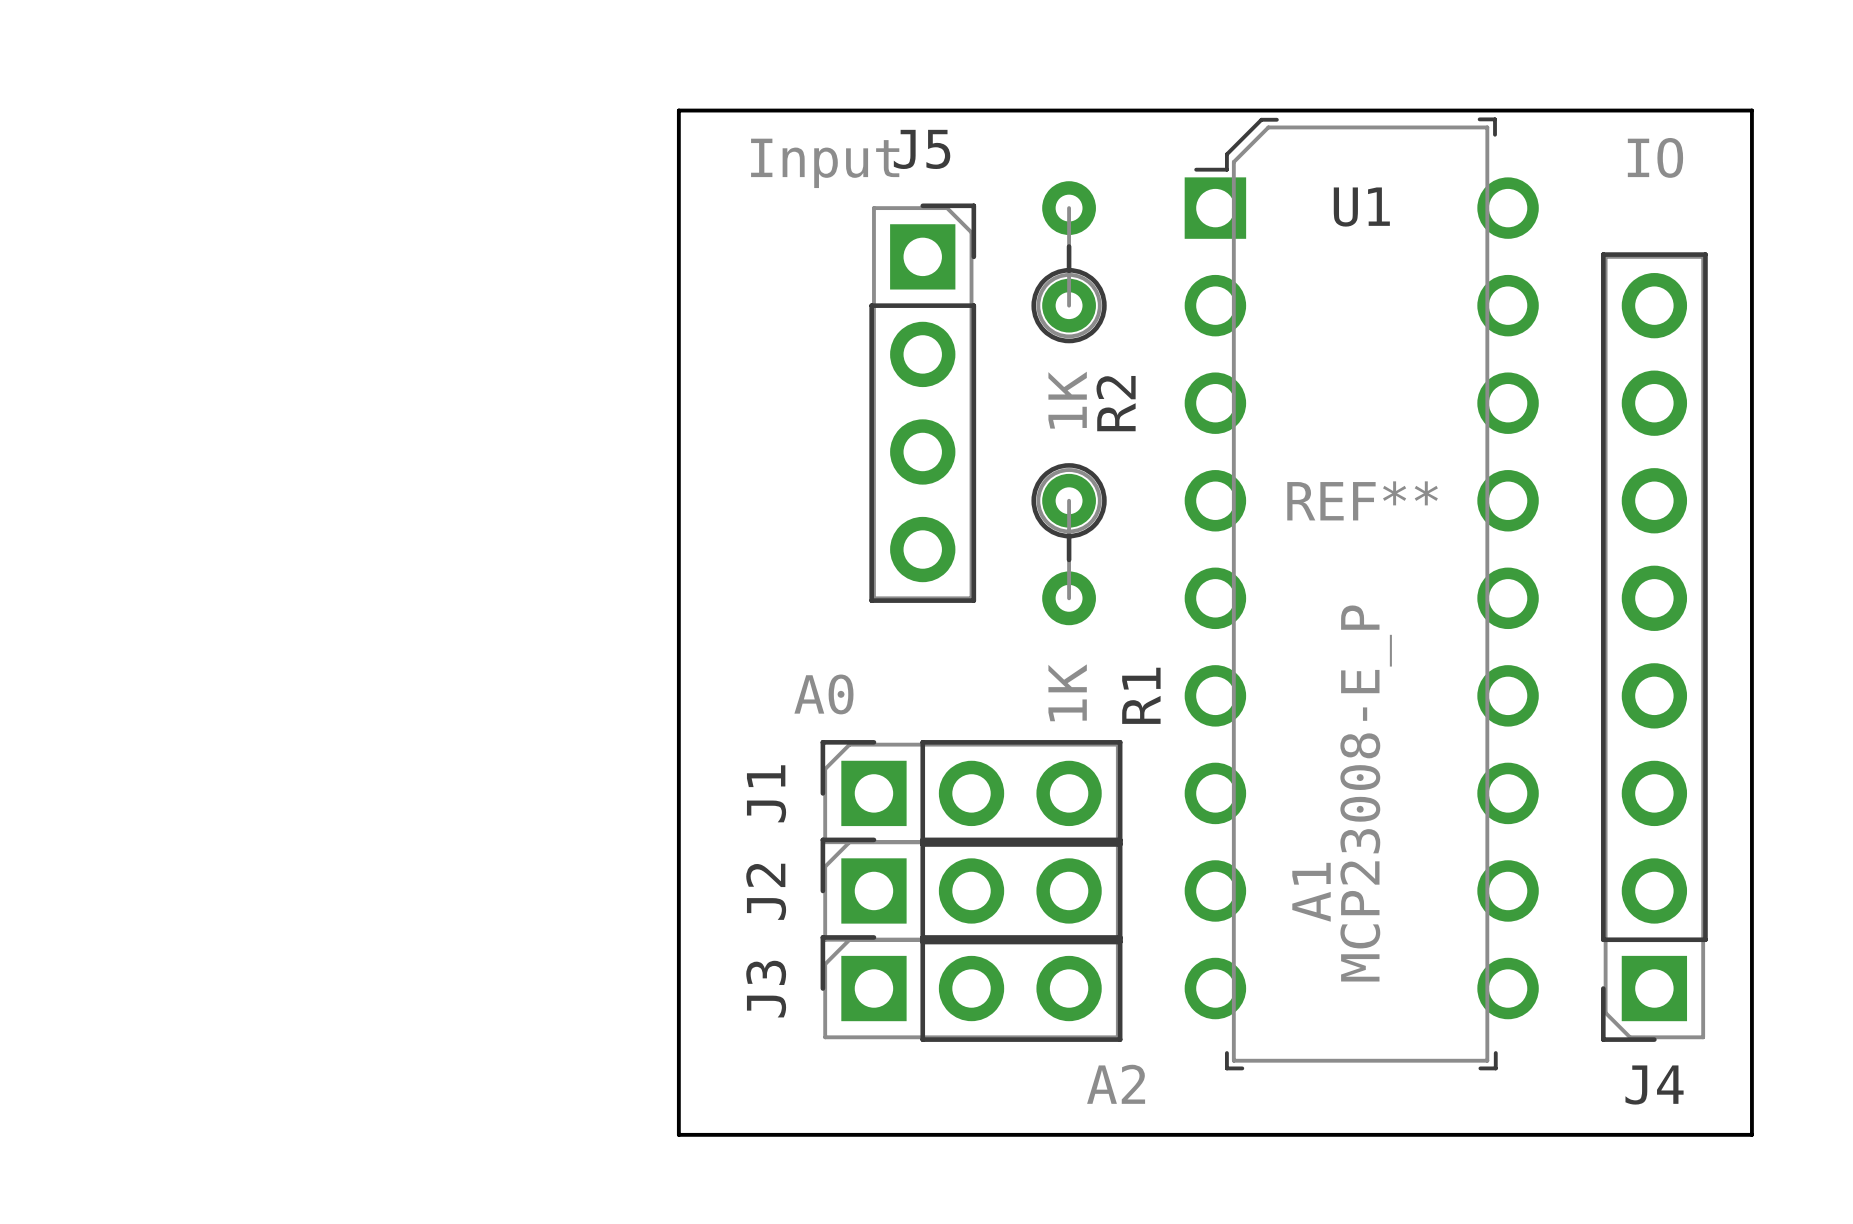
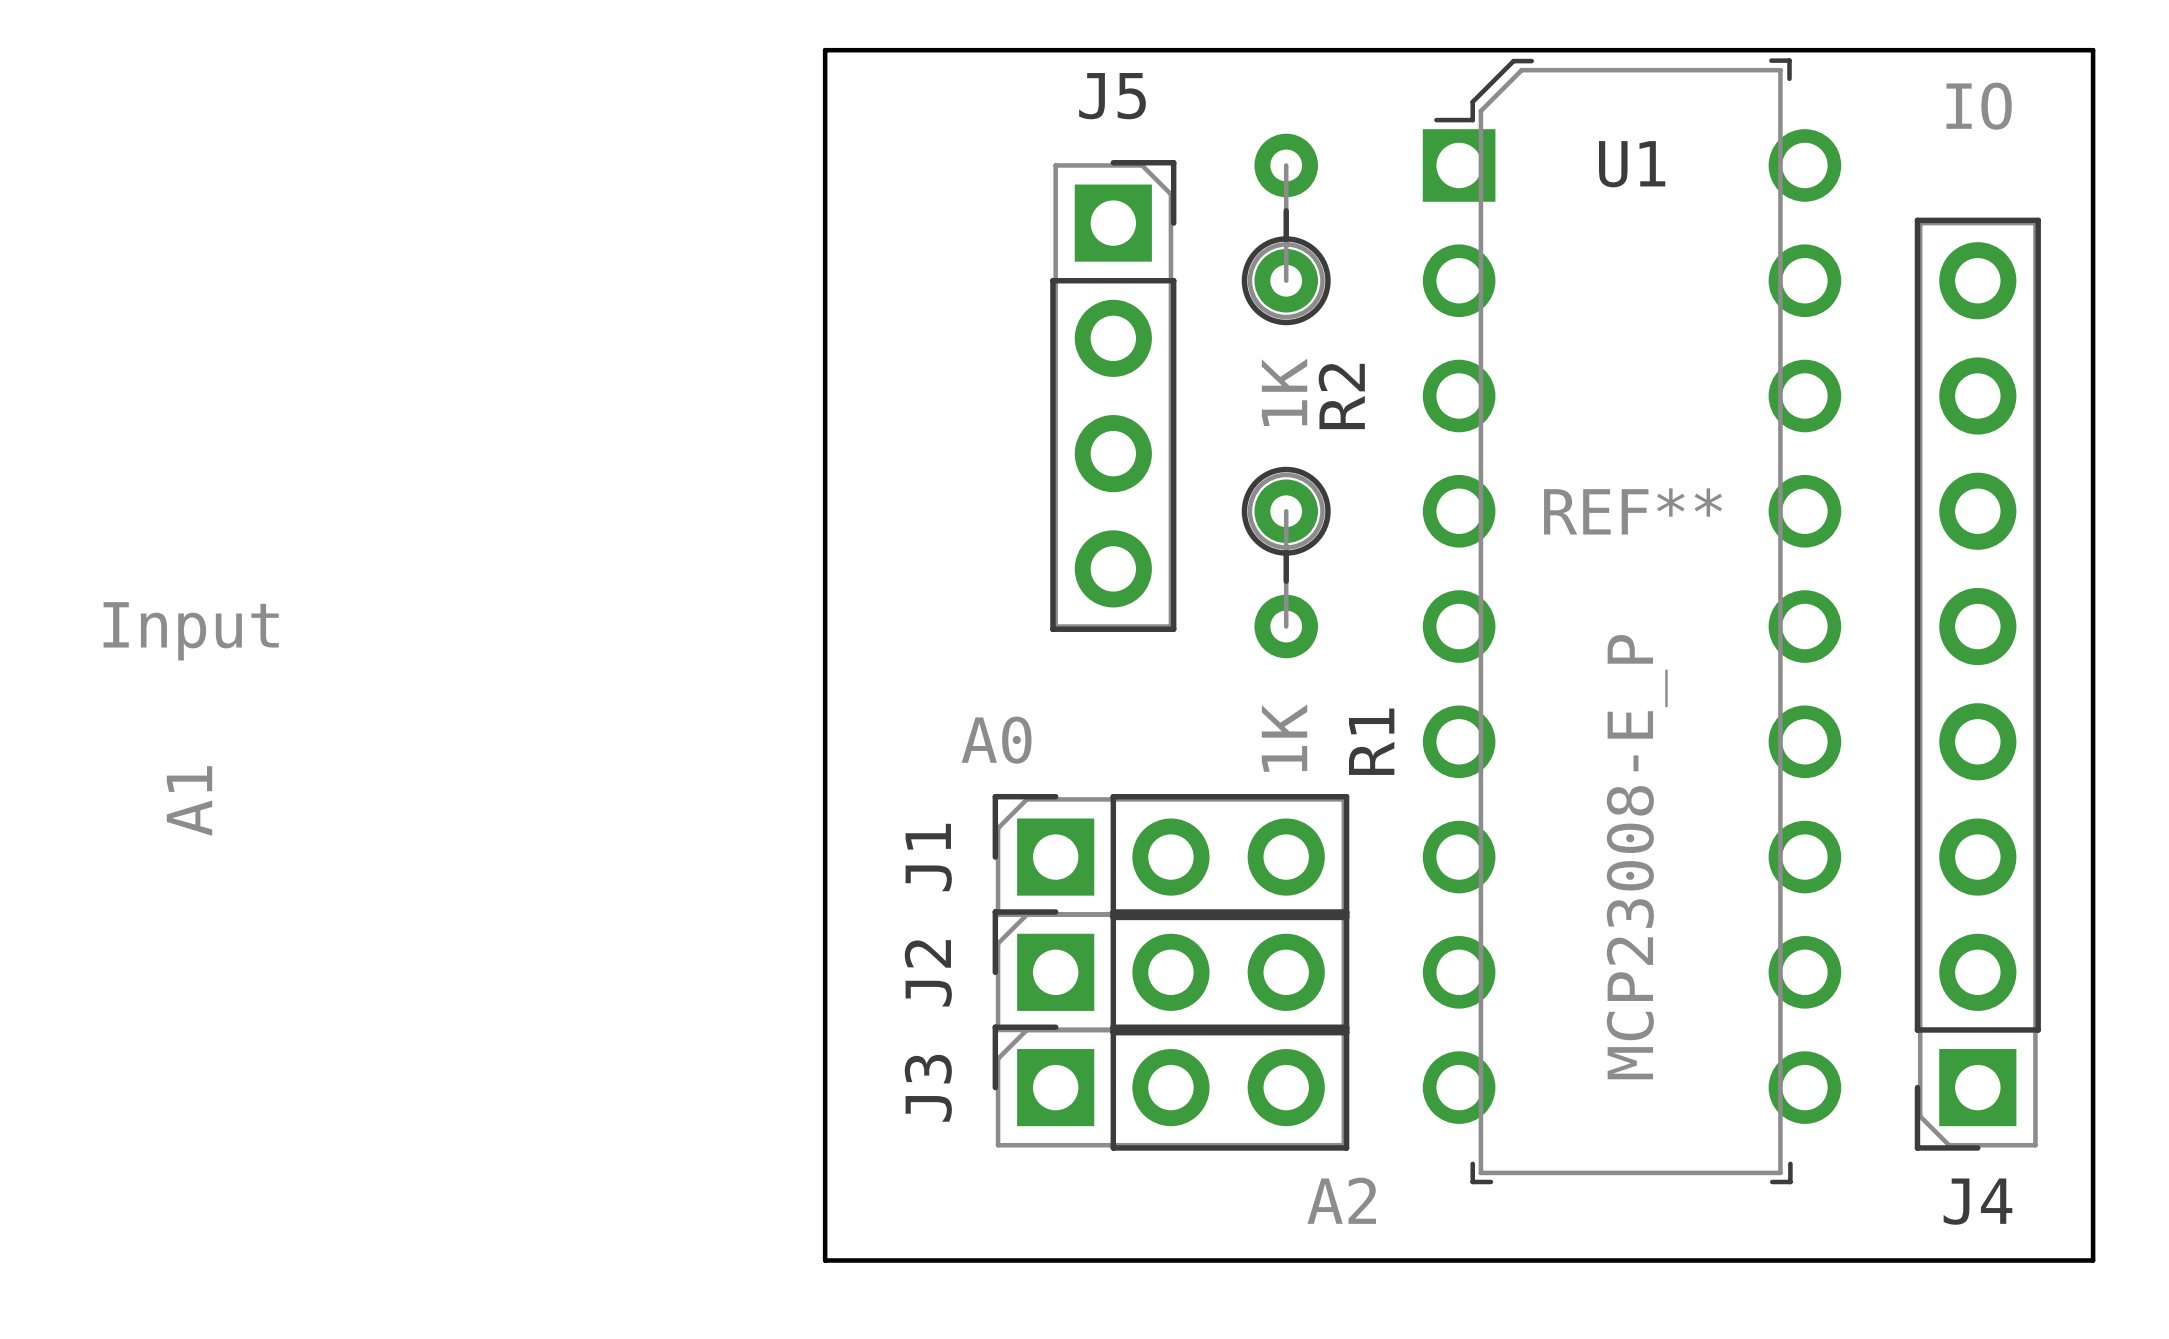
J5 value position: Input (825, 163) -> Input (191, 631)
J2 value position: A1 (1311, 892) -> A1 (189, 800)

